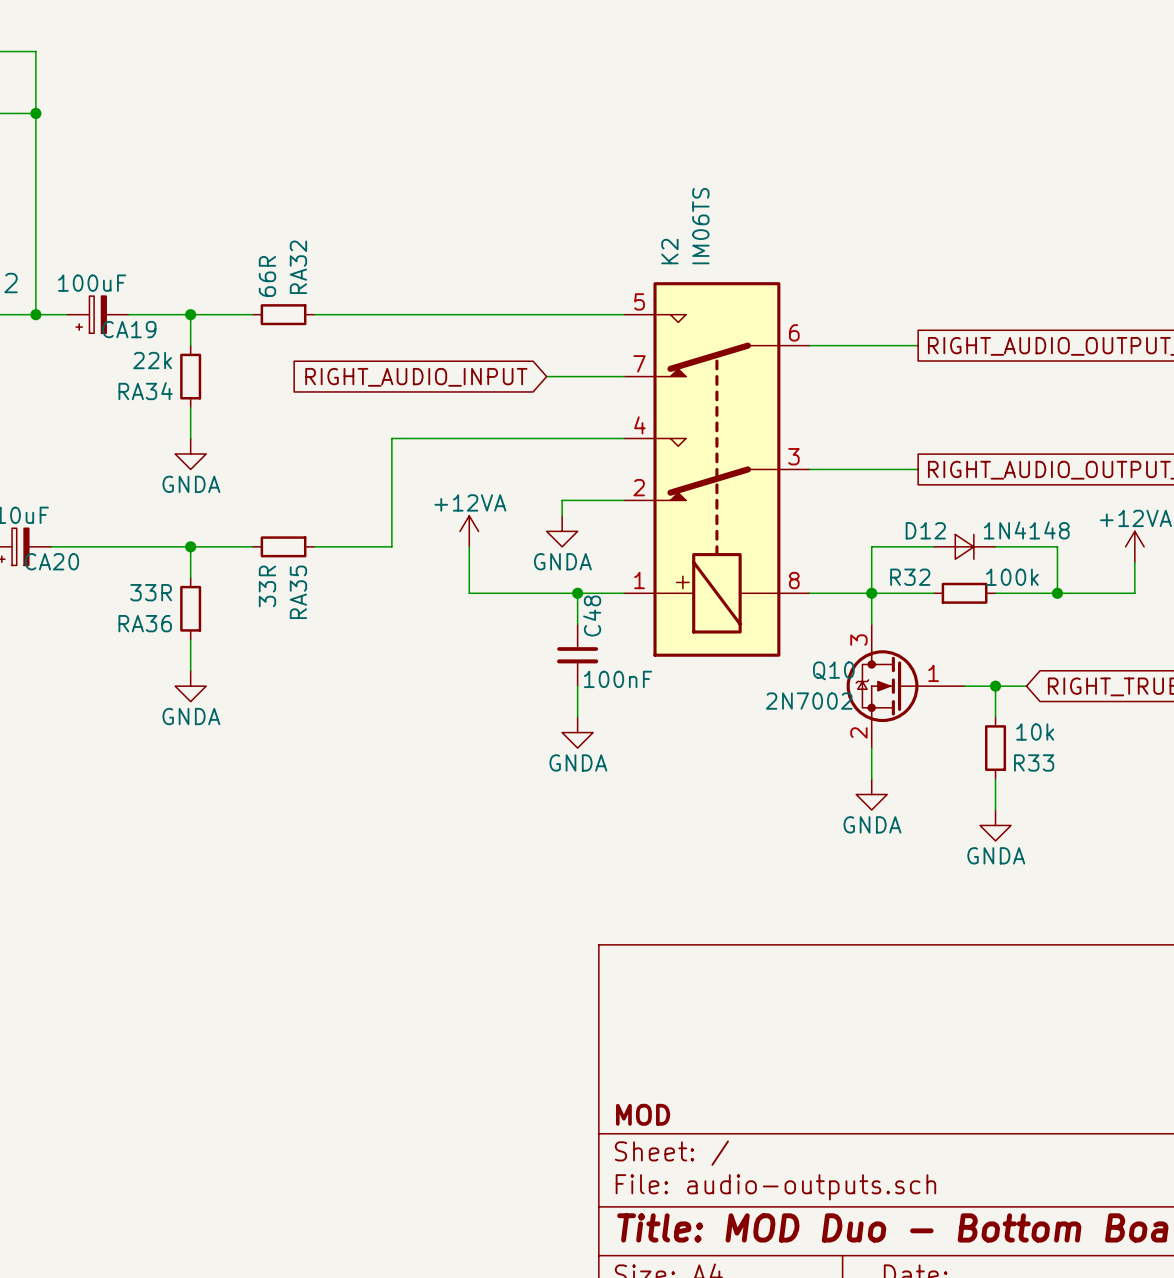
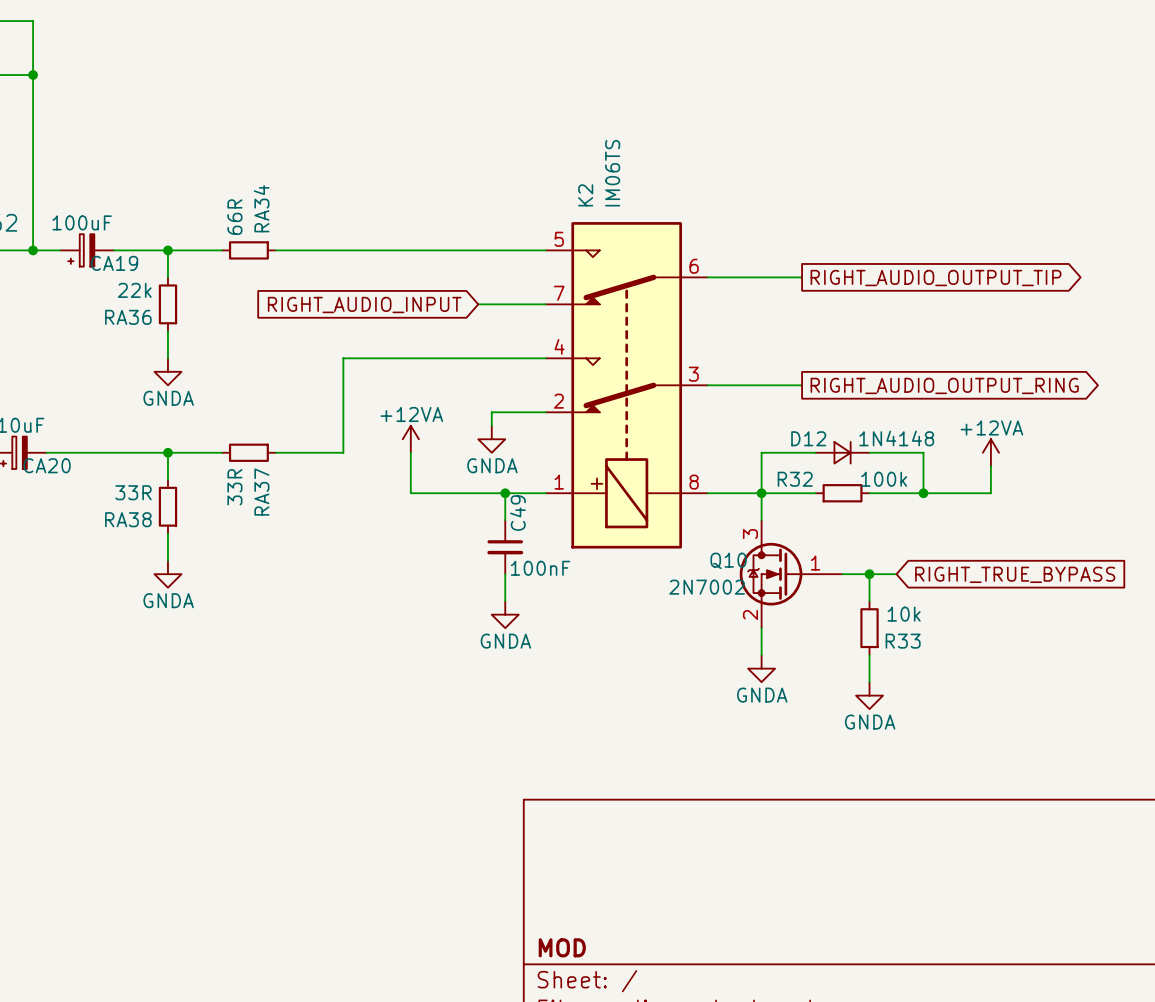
RA32 name: RA32 (298, 267) -> RA34 (261, 208)
RA34 name: RA34 (145, 391) -> RA36 (128, 317)
RA35 name: RA35 (298, 592) -> RA37 (261, 492)
C48 name: C48 (592, 616) -> C49 (517, 513)
RA36 name: RA36 (145, 623) -> RA38 (128, 519)

